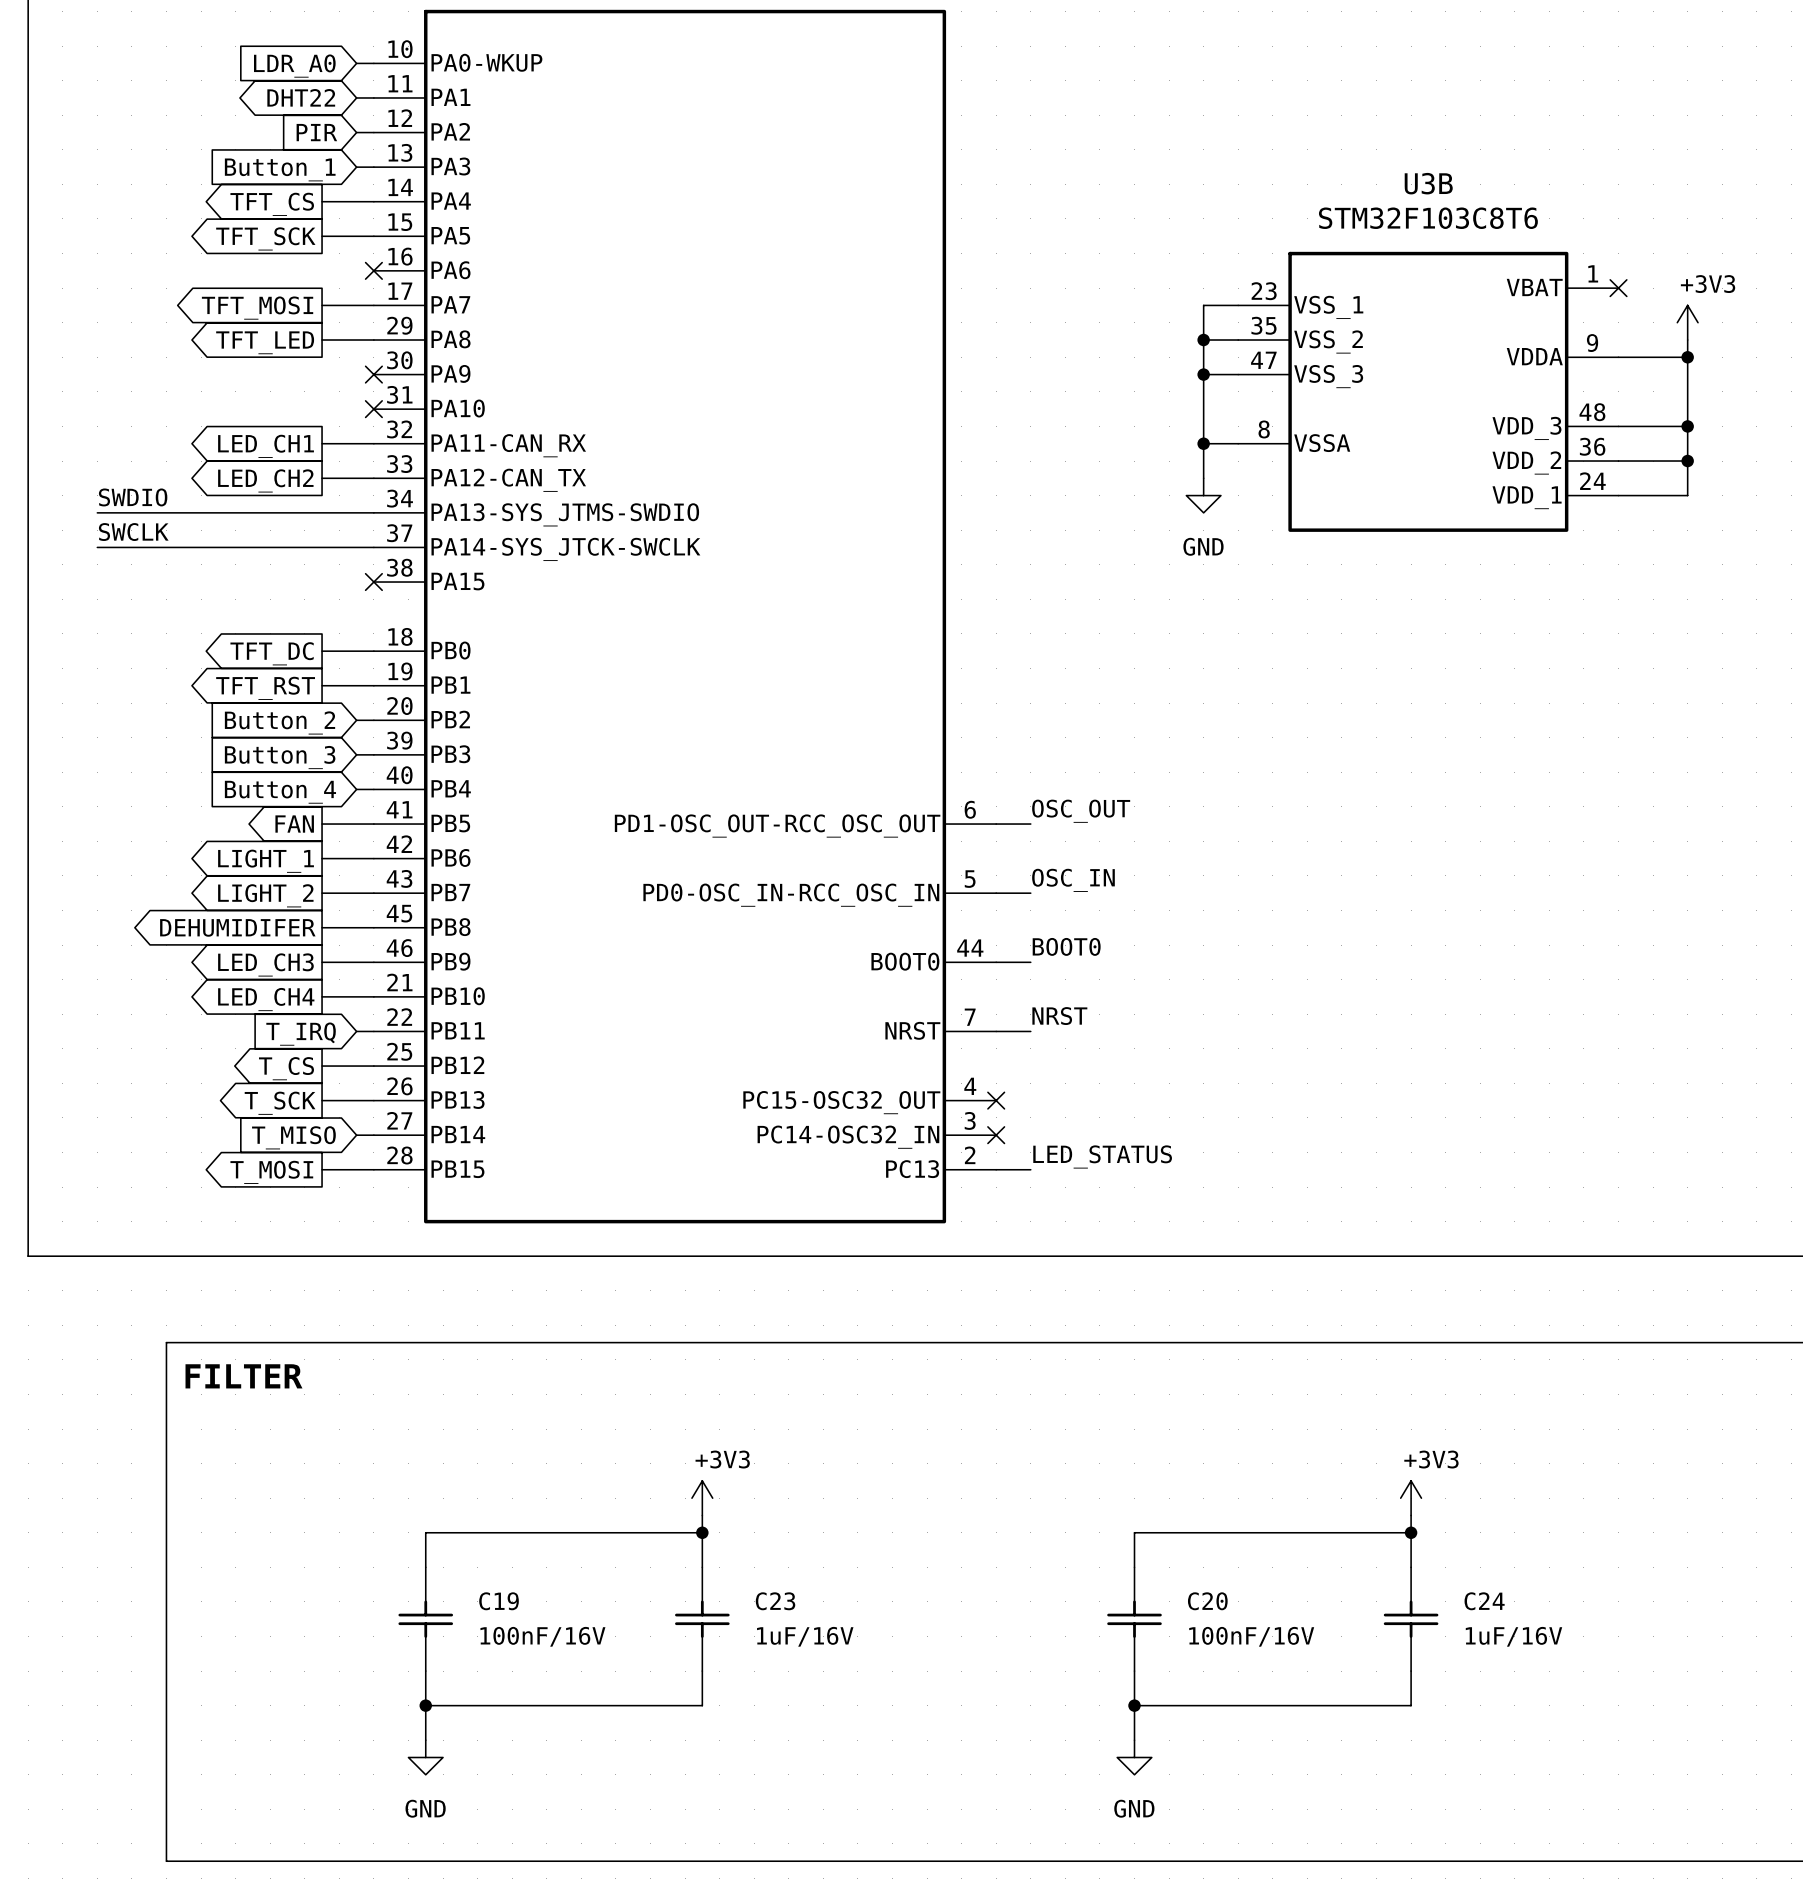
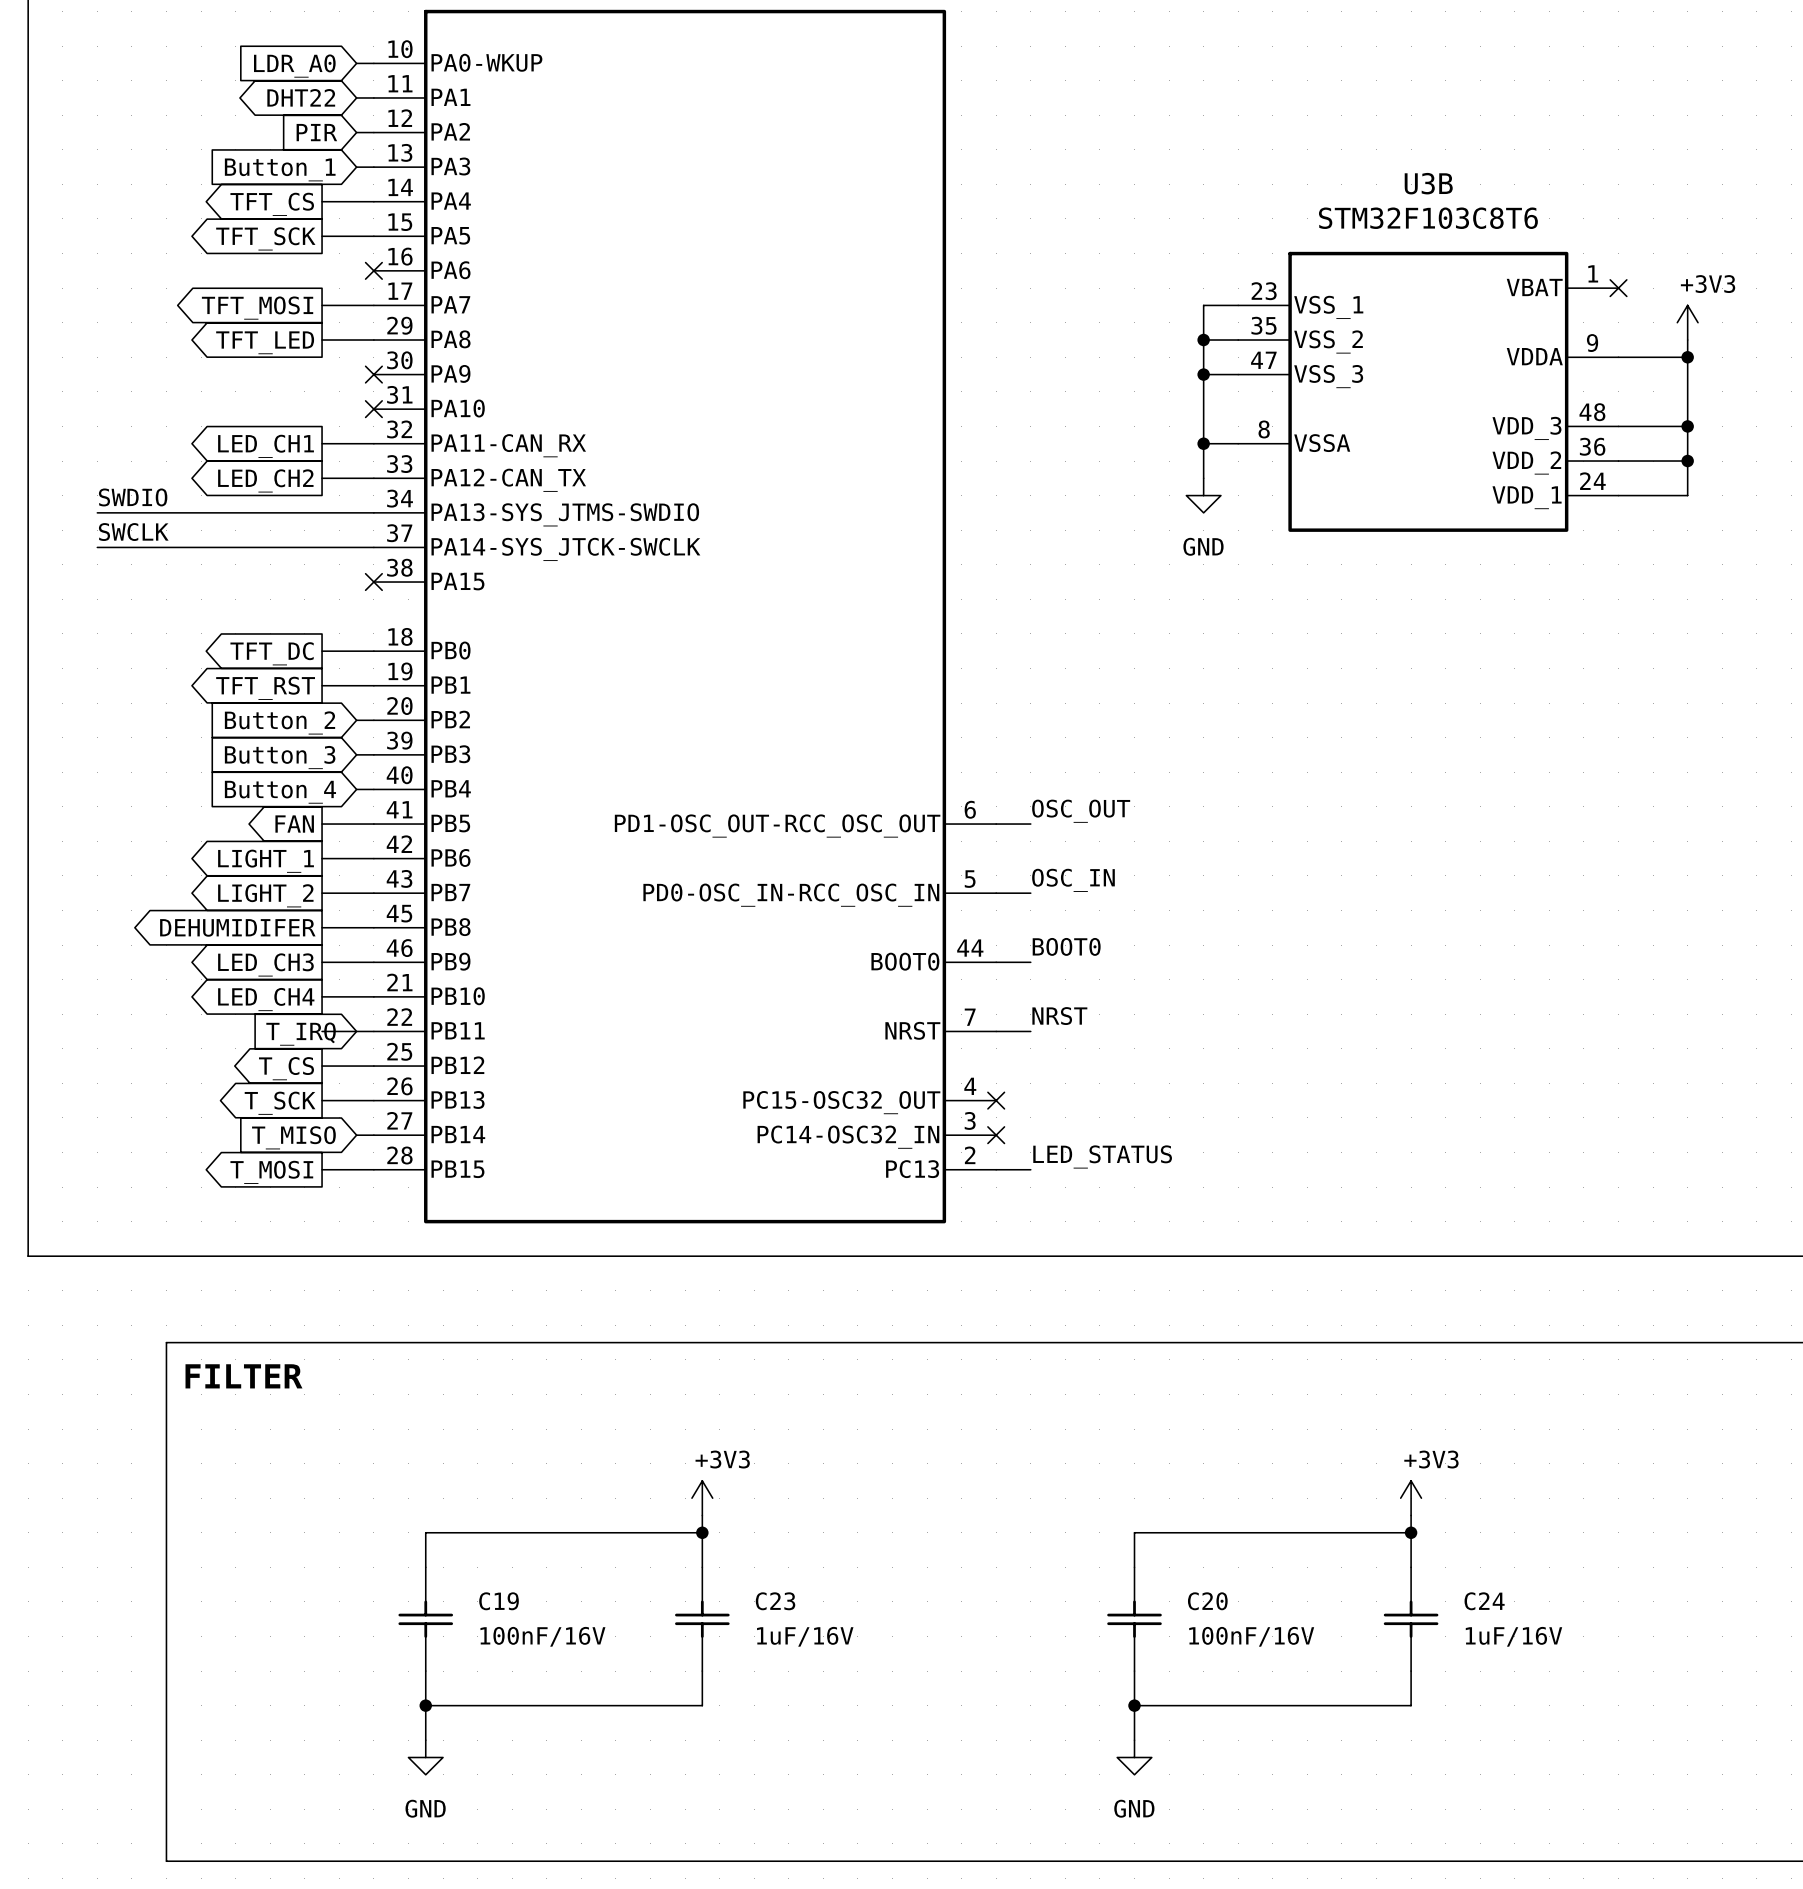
wire: none -> (322, 1031) (356, 1031)

